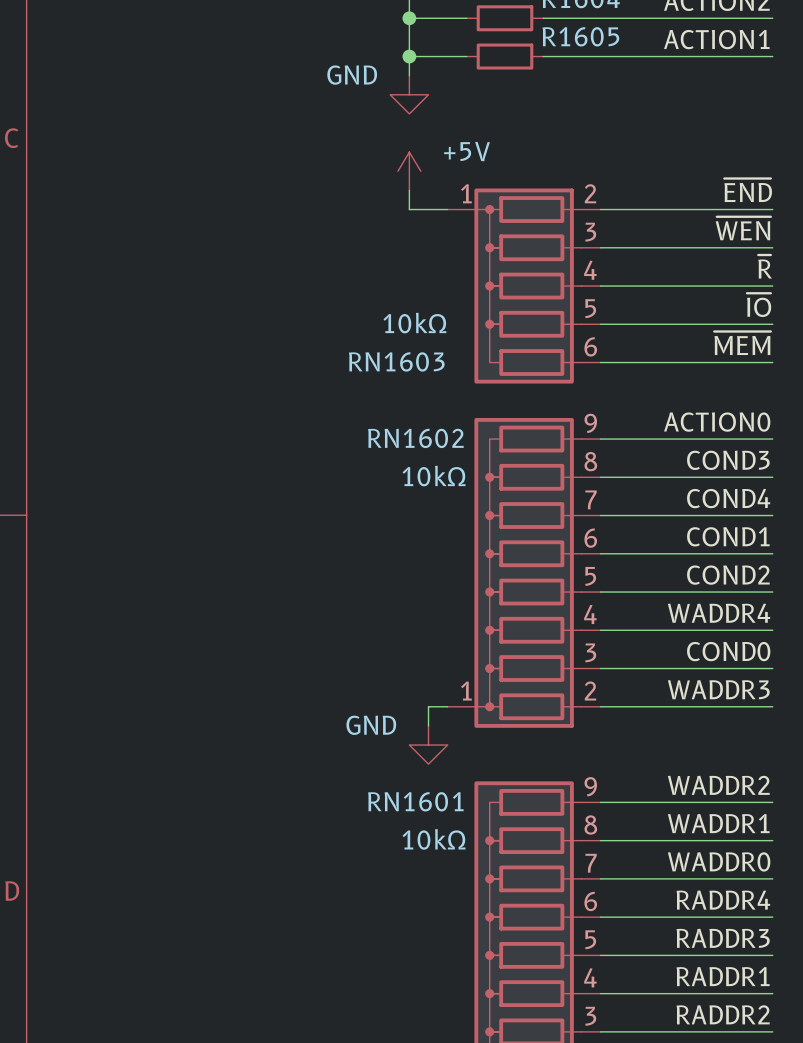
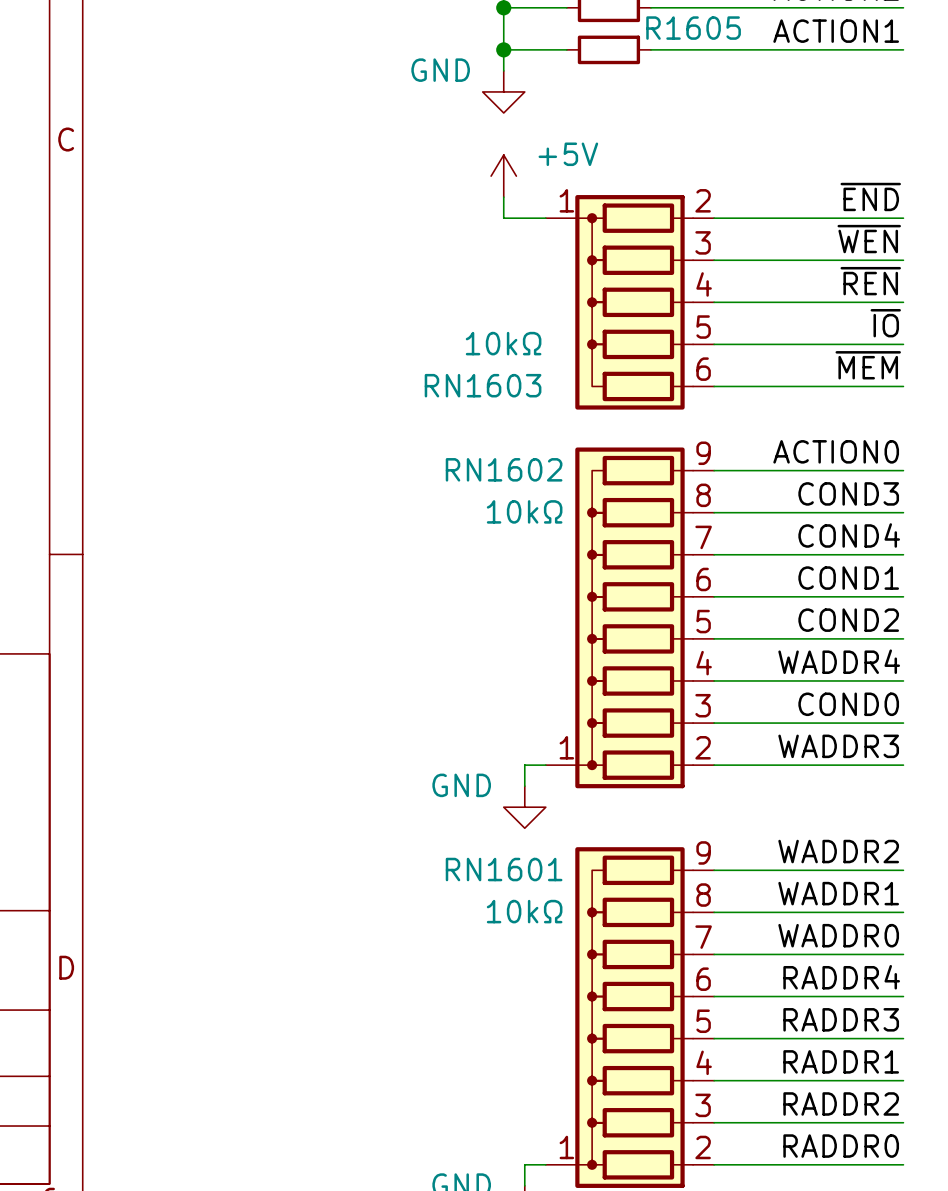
label: ~{R} (765, 266) -> ~{REN} (870, 281)

